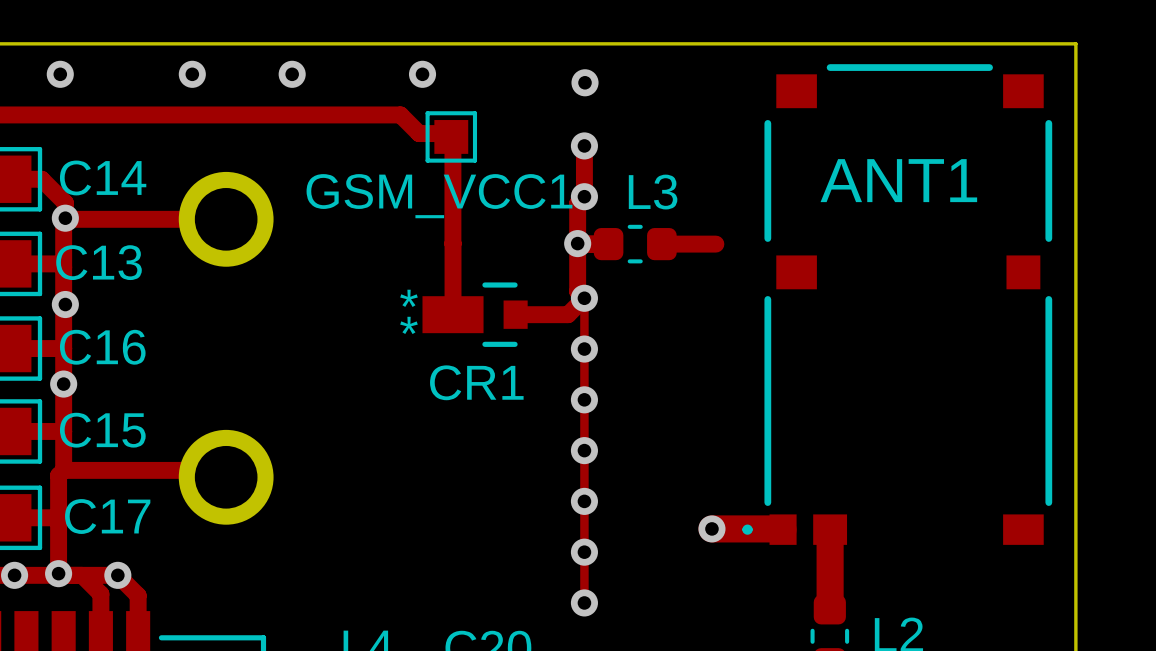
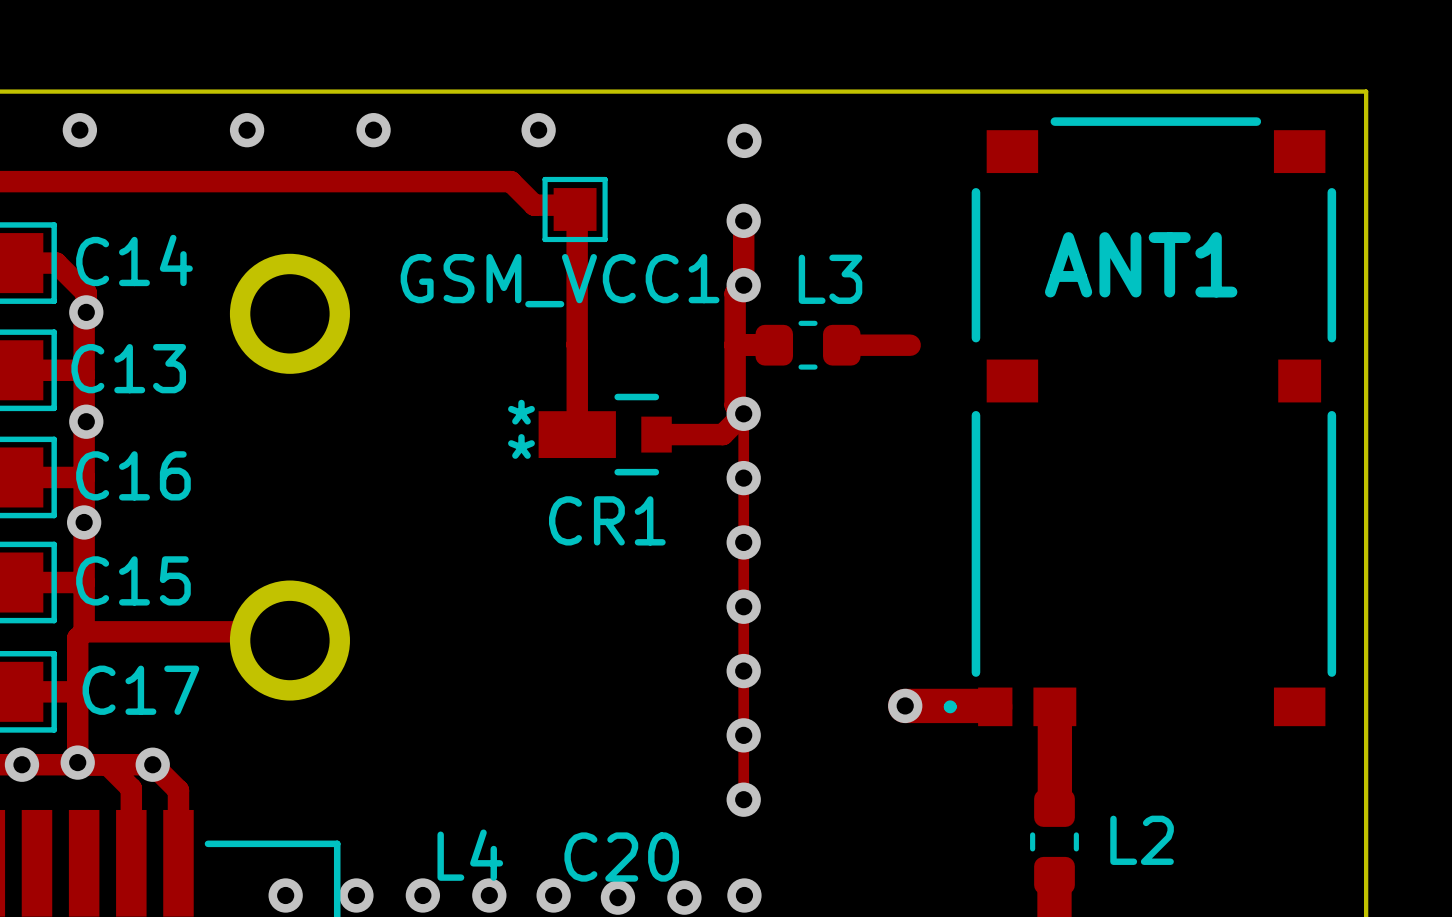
track: (65, 218) (226, 219) -> none
via: (577, 243) -> none

